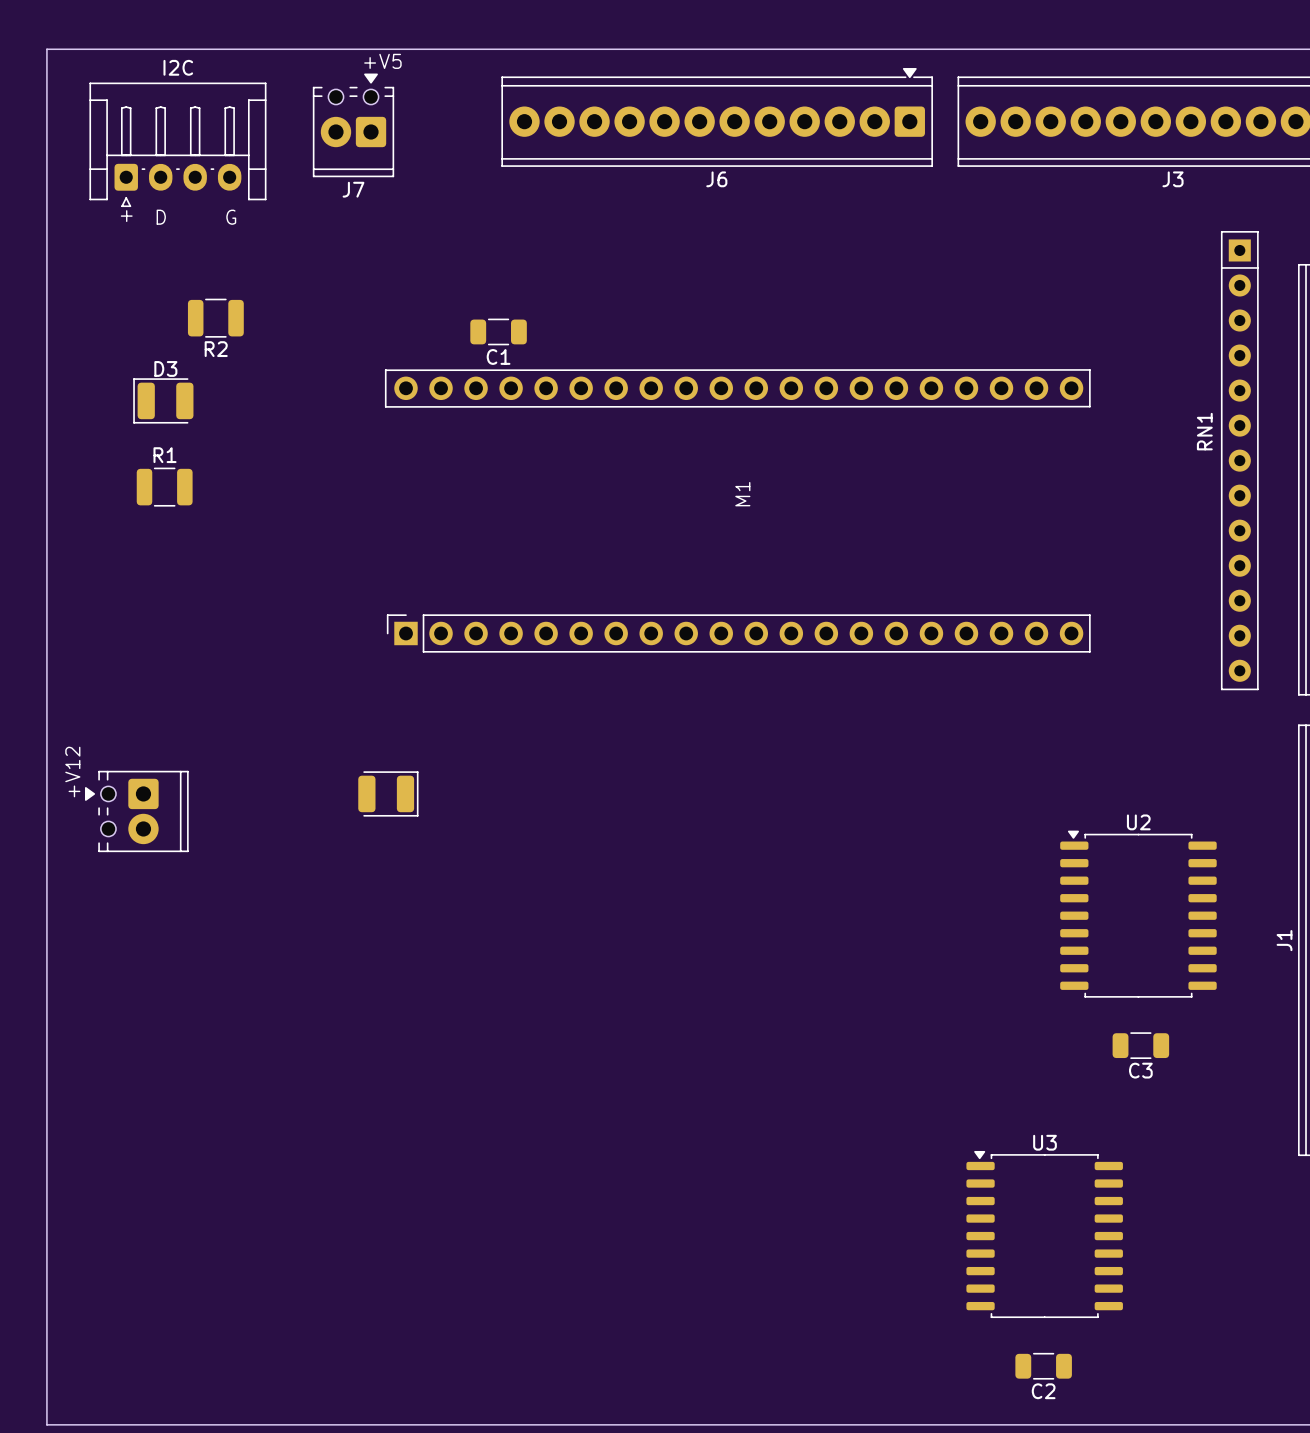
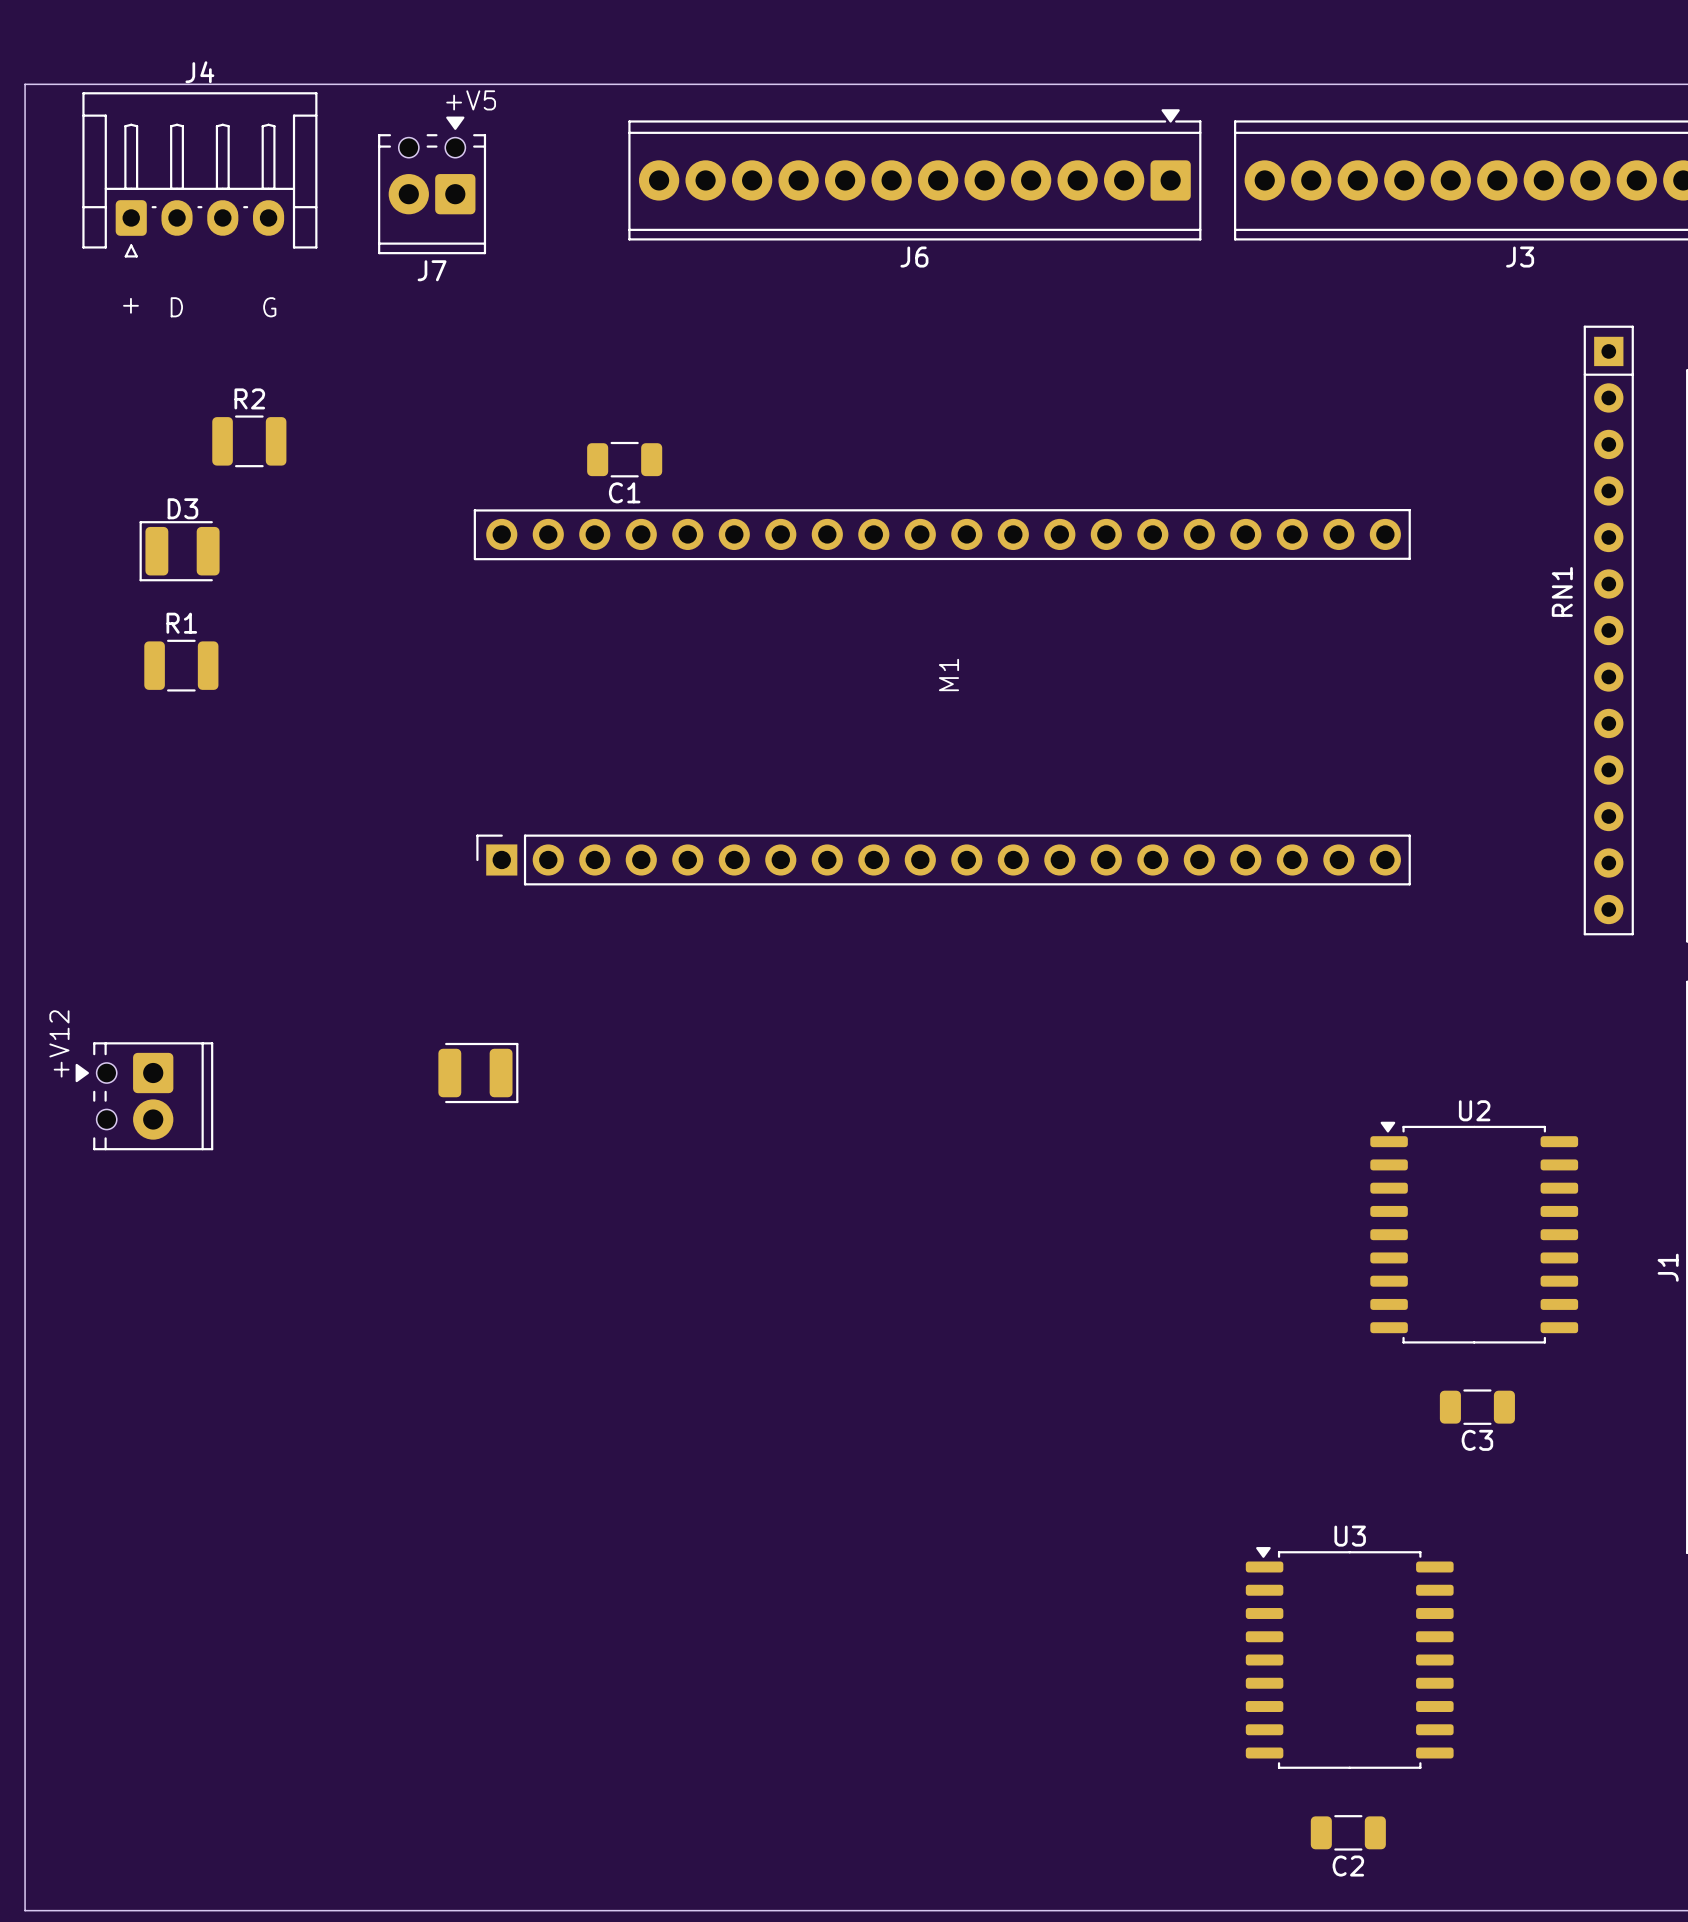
J4: none -> (199, 174)
I2C: (177, 144) -> none
R2 name position: R2 (216, 349) -> R2 (249, 398)

